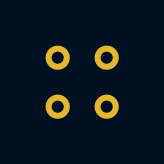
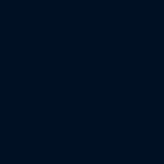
part: (57, 57) -> none
part: (106, 57) -> none
part: (57, 106) -> none
part: (106, 106) -> none

